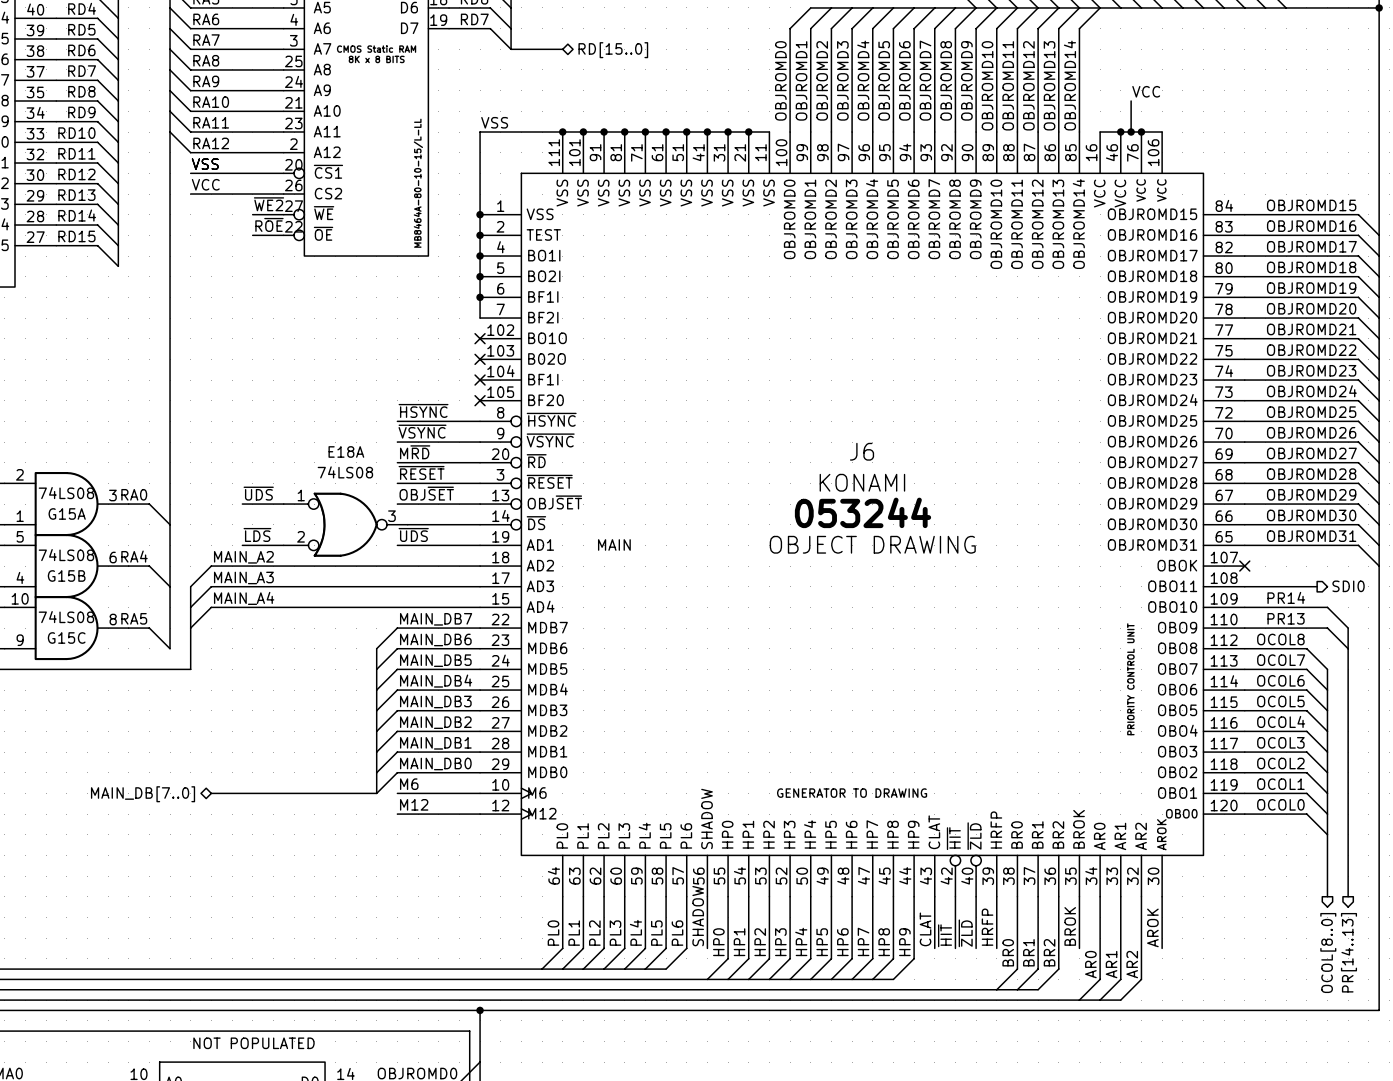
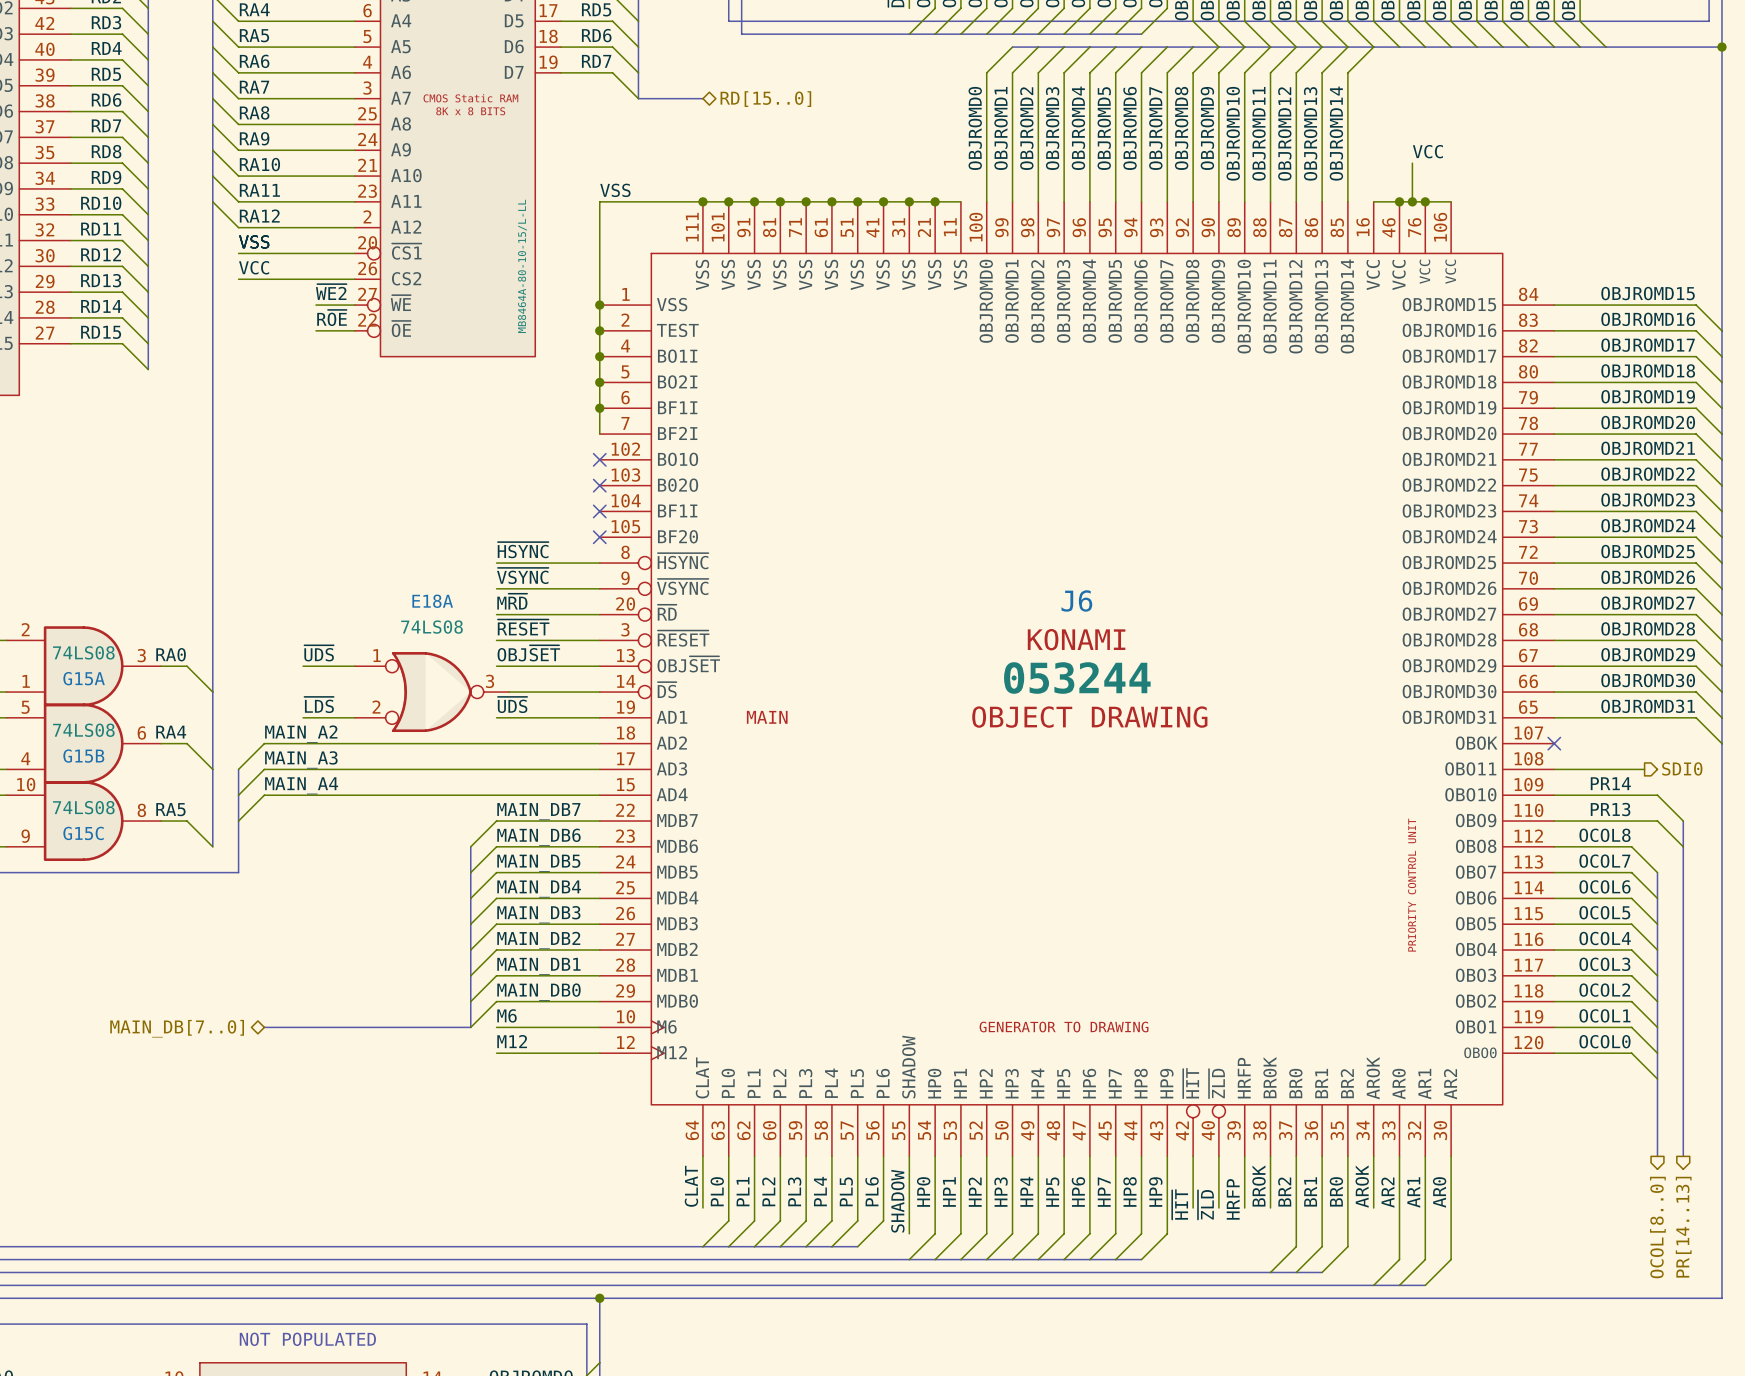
J6 symbol: [480, 132, 1245, 897] -> [599, 201, 1555, 1157]
label: SHADOW (698, 916) -> none
label: none -> CLAT (691, 1186)
label: none -> HP0 (923, 1191)
label position: BROK (1070, 926) -> BROK (1259, 1186)
label position: AROK (1152, 927) -> AROK (1362, 1186)
label: CLAT (925, 929) -> none
label position: PL4 (635, 932) -> PL4 (820, 1191)
label position: PL0 (553, 933) -> PL0 (717, 1191)
label position: PL1 (574, 933) -> PL1 (743, 1191)
label position: PL2 (594, 933) -> PL2 (768, 1191)
label position: PL3 (615, 933) -> PL3 (794, 1191)
label position: PL5 (656, 933) -> PL5 (846, 1191)
label position: PL6 (677, 933) -> PL6 (872, 1191)
wire: (562, 938) (562, 948) (542, 969) -> none
wire: (955, 938) (955, 948) -> none
wire: (976, 938) (976, 948) -> none
wire: (996, 938) (996, 948) -> none
wire: (1017, 938) (1017, 969) (996, 989) -> (1451, 1220) (1451, 1259) (1425, 1285)
wire: (1100, 938) (1100, 979) (1079, 1000) -> none
label position: HP4 (801, 941) -> HP4 (1026, 1191)
label position: HP7 (863, 941) -> HP7 (1104, 1192)
label: HP0 (718, 942) -> SHADOW (897, 1201)
label position: HP1 (739, 942) -> HP1 (949, 1192)
label position: HP2 (760, 942) -> HP2 (975, 1192)
label position: HP3 (780, 942) -> HP3 (1001, 1192)
label position: HP5 (822, 942) -> HP5 (1052, 1192)
label position: HP6 (842, 942) -> HP6 (1078, 1191)
label position: HP8 (884, 942) -> HP8 (1130, 1191)
label position: HP9 (904, 942) -> HP9 (1155, 1192)
wire: none -> (1167, 1220) (1167, 1233) (1141, 1259)
wire: none -> (1347, 1220) (1347, 1246) (1322, 1272)
label position: BR0 (1008, 952) -> BR0 (1336, 1191)
label position: BR1 (1028, 952) -> BR1 (1310, 1191)
label position: BR2 (1049, 952) -> BR2 (1284, 1192)
wire: (728, 958) (707, 979) -> (883, 1220) (857, 1246)
label position: AR0 (1090, 964) -> AR0 (1439, 1192)
label position: AR1 (1111, 964) -> AR1 (1413, 1192)
label position: AR2 (1132, 964) -> AR2 (1387, 1192)
bus: none -> (831, 1246) (857, 1246)
bus: none -> (1115, 1259) (1141, 1259)
bus: none -> (1296, 1272) (1322, 1272)
bus: none -> (1399, 1285) (1425, 1285)

